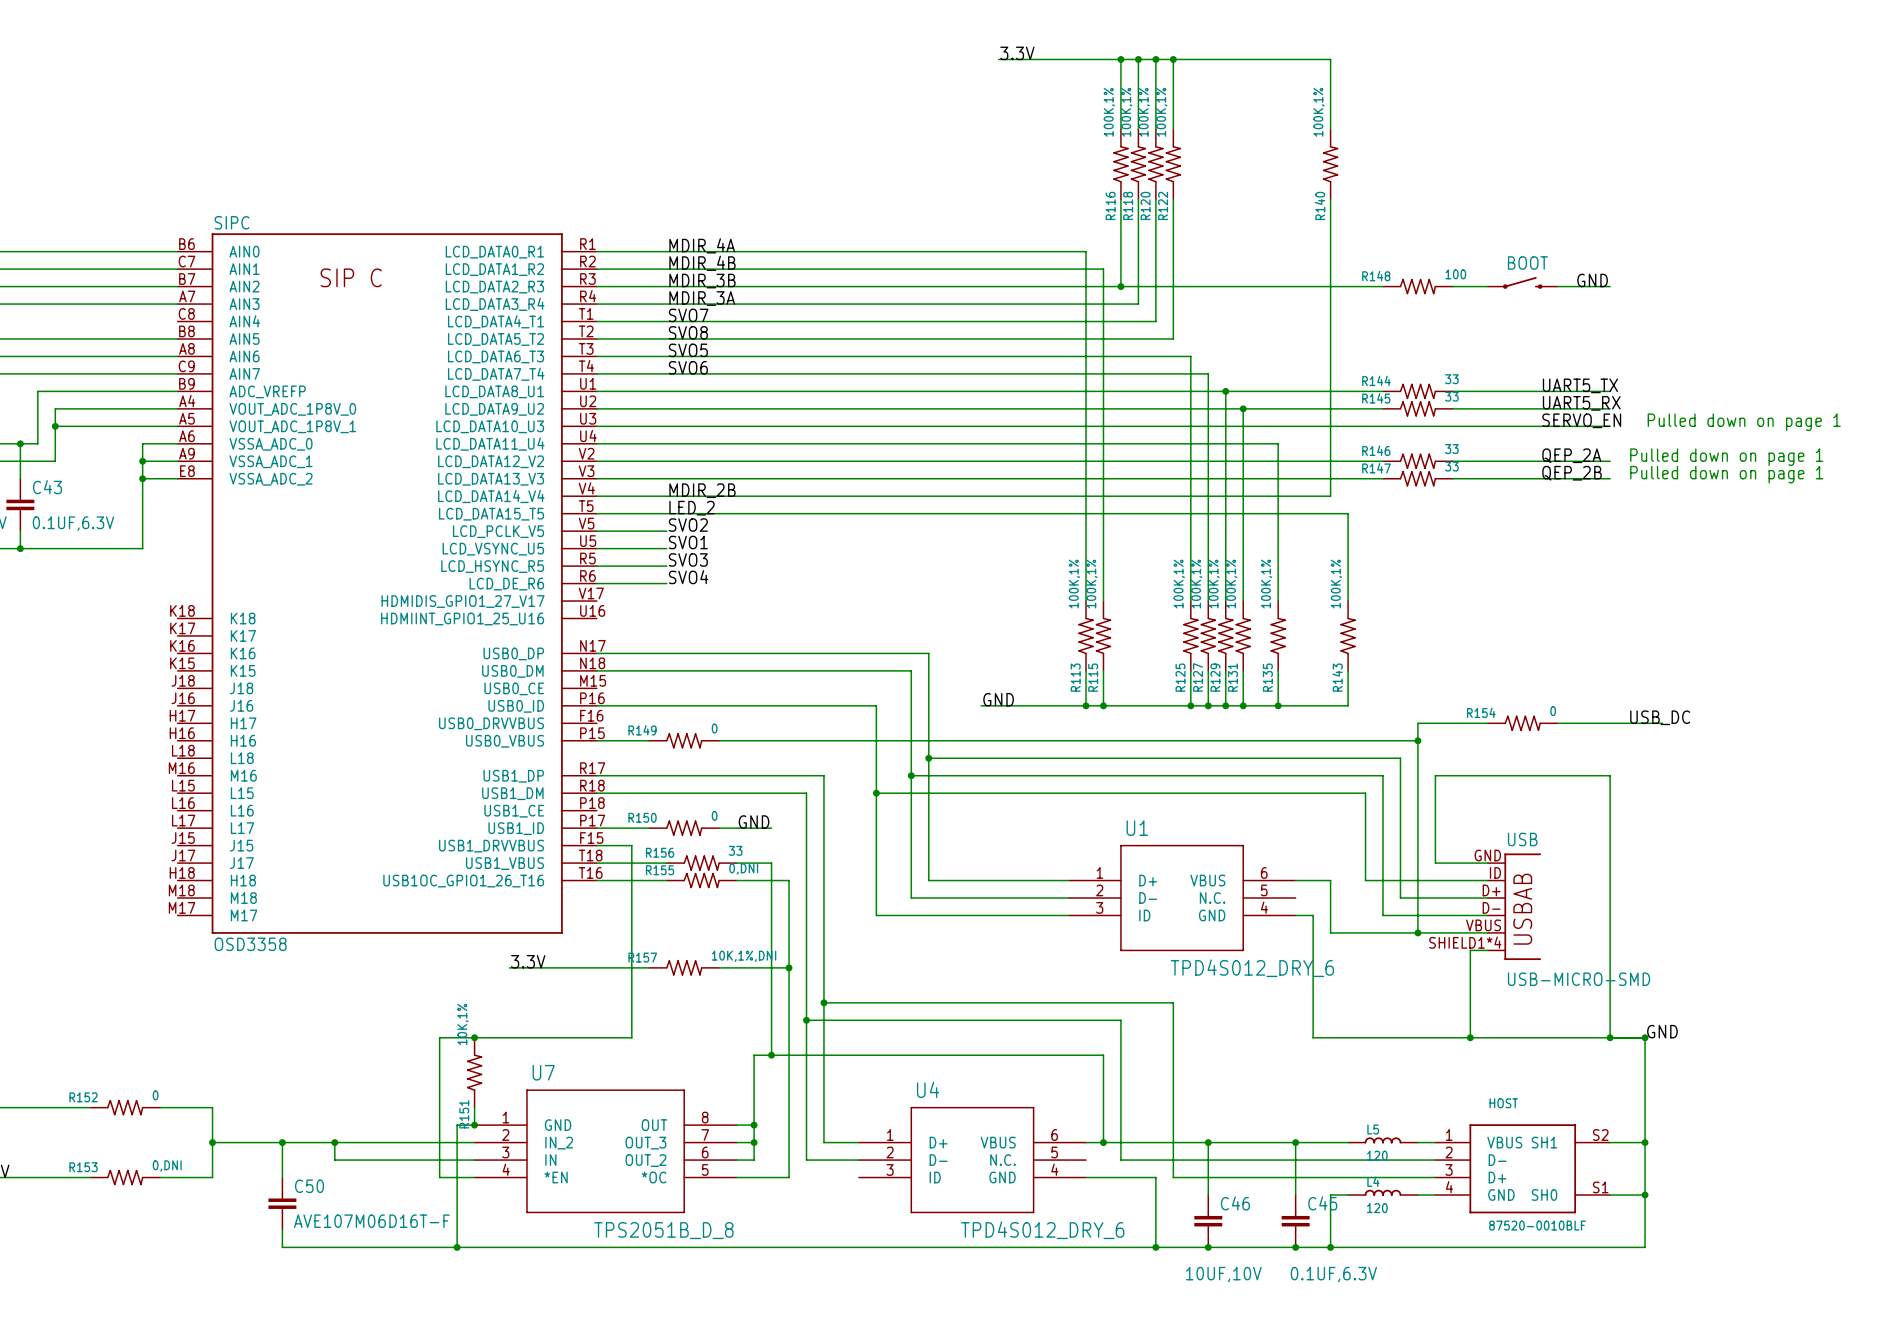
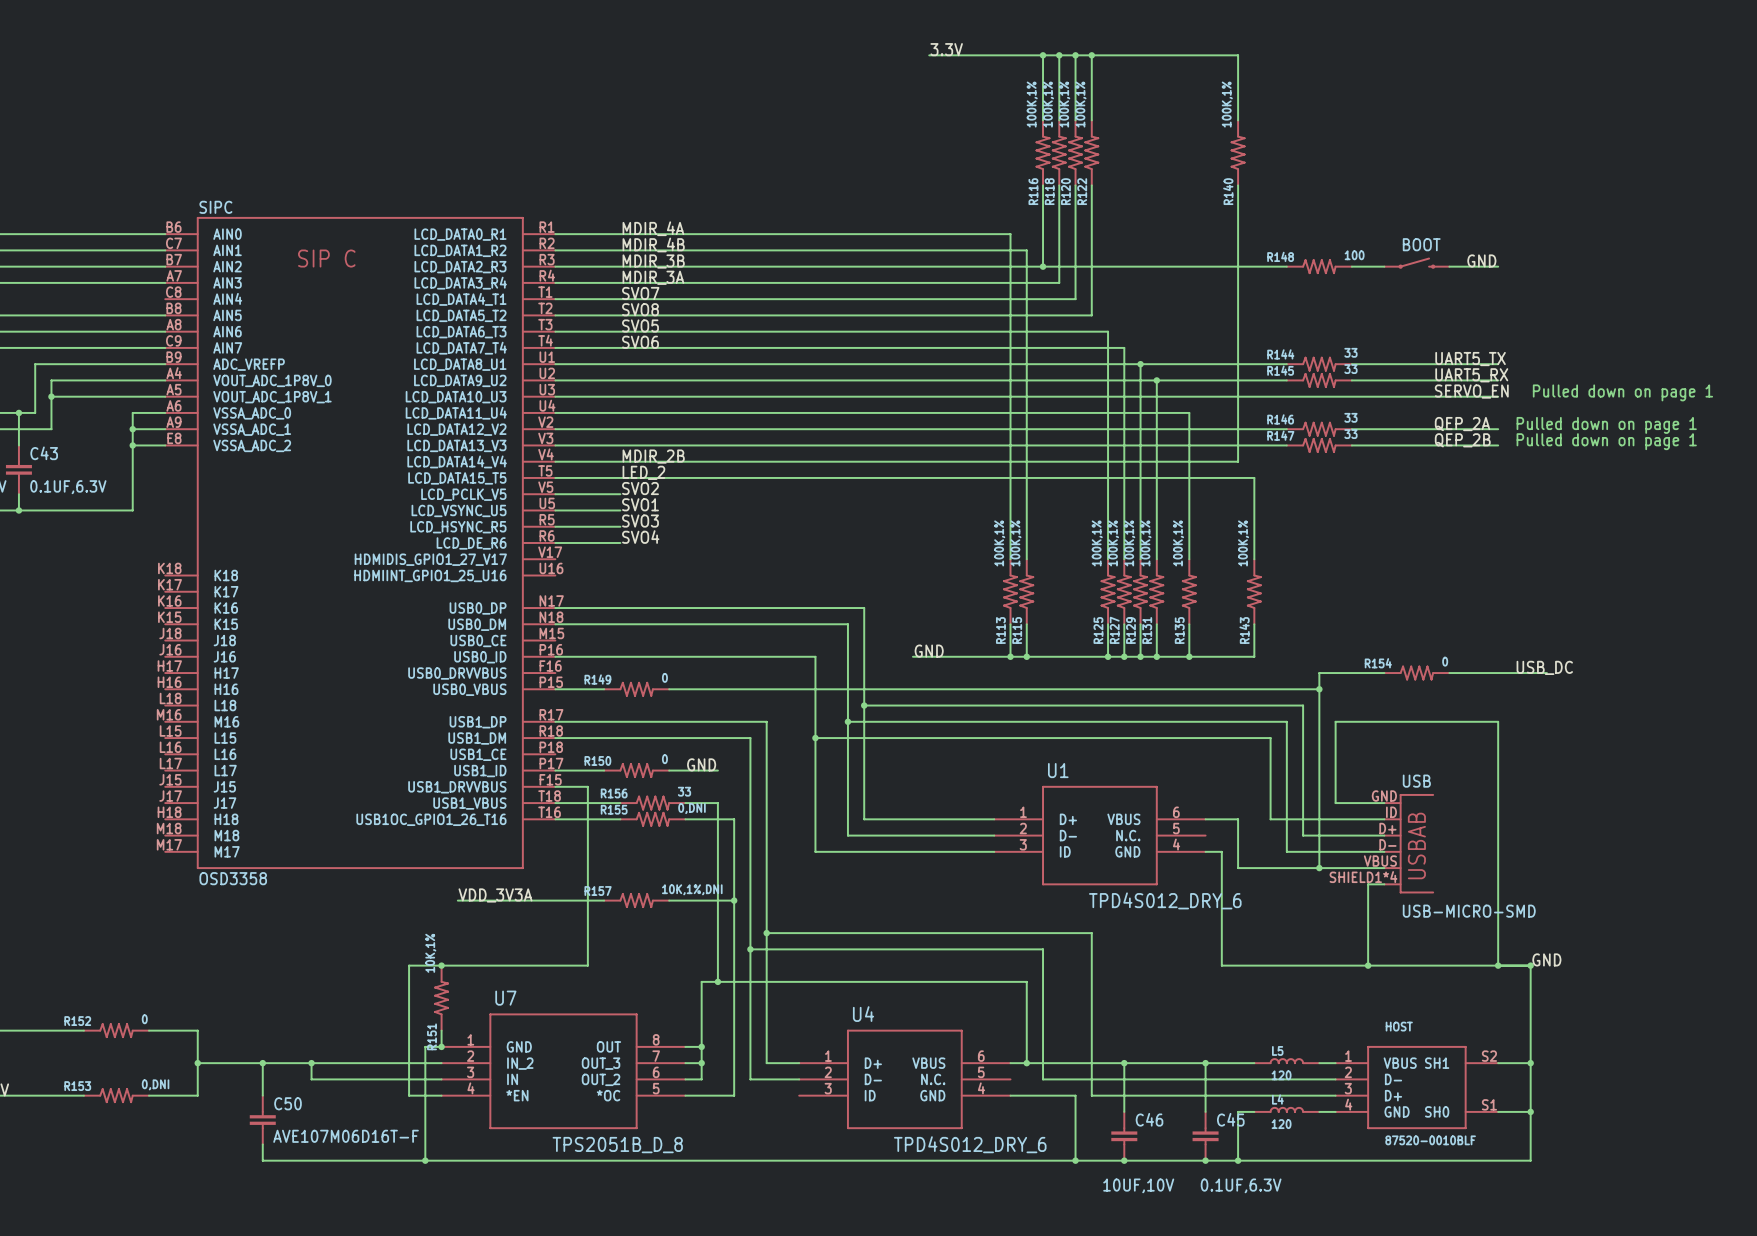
label: 3.3V (528, 961) -> none
label: none -> VDD_3V3A (495, 895)
wire: none -> (457, 900) (474, 900)

